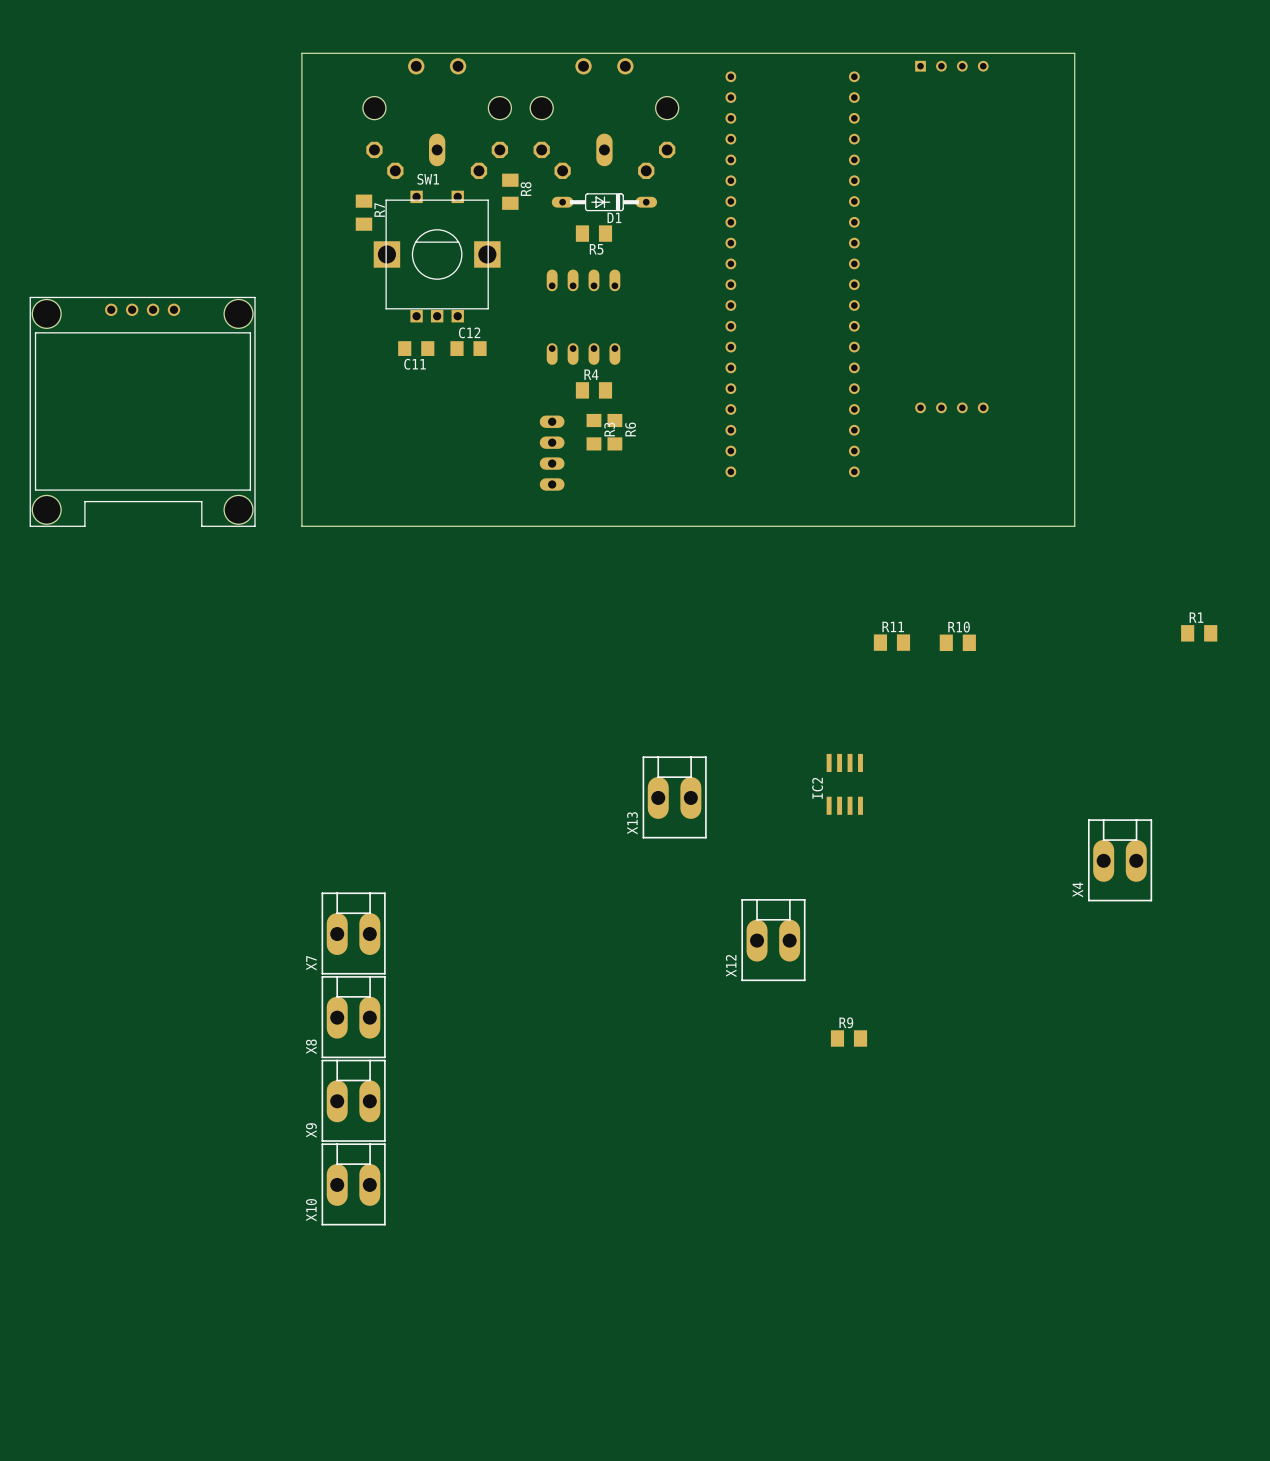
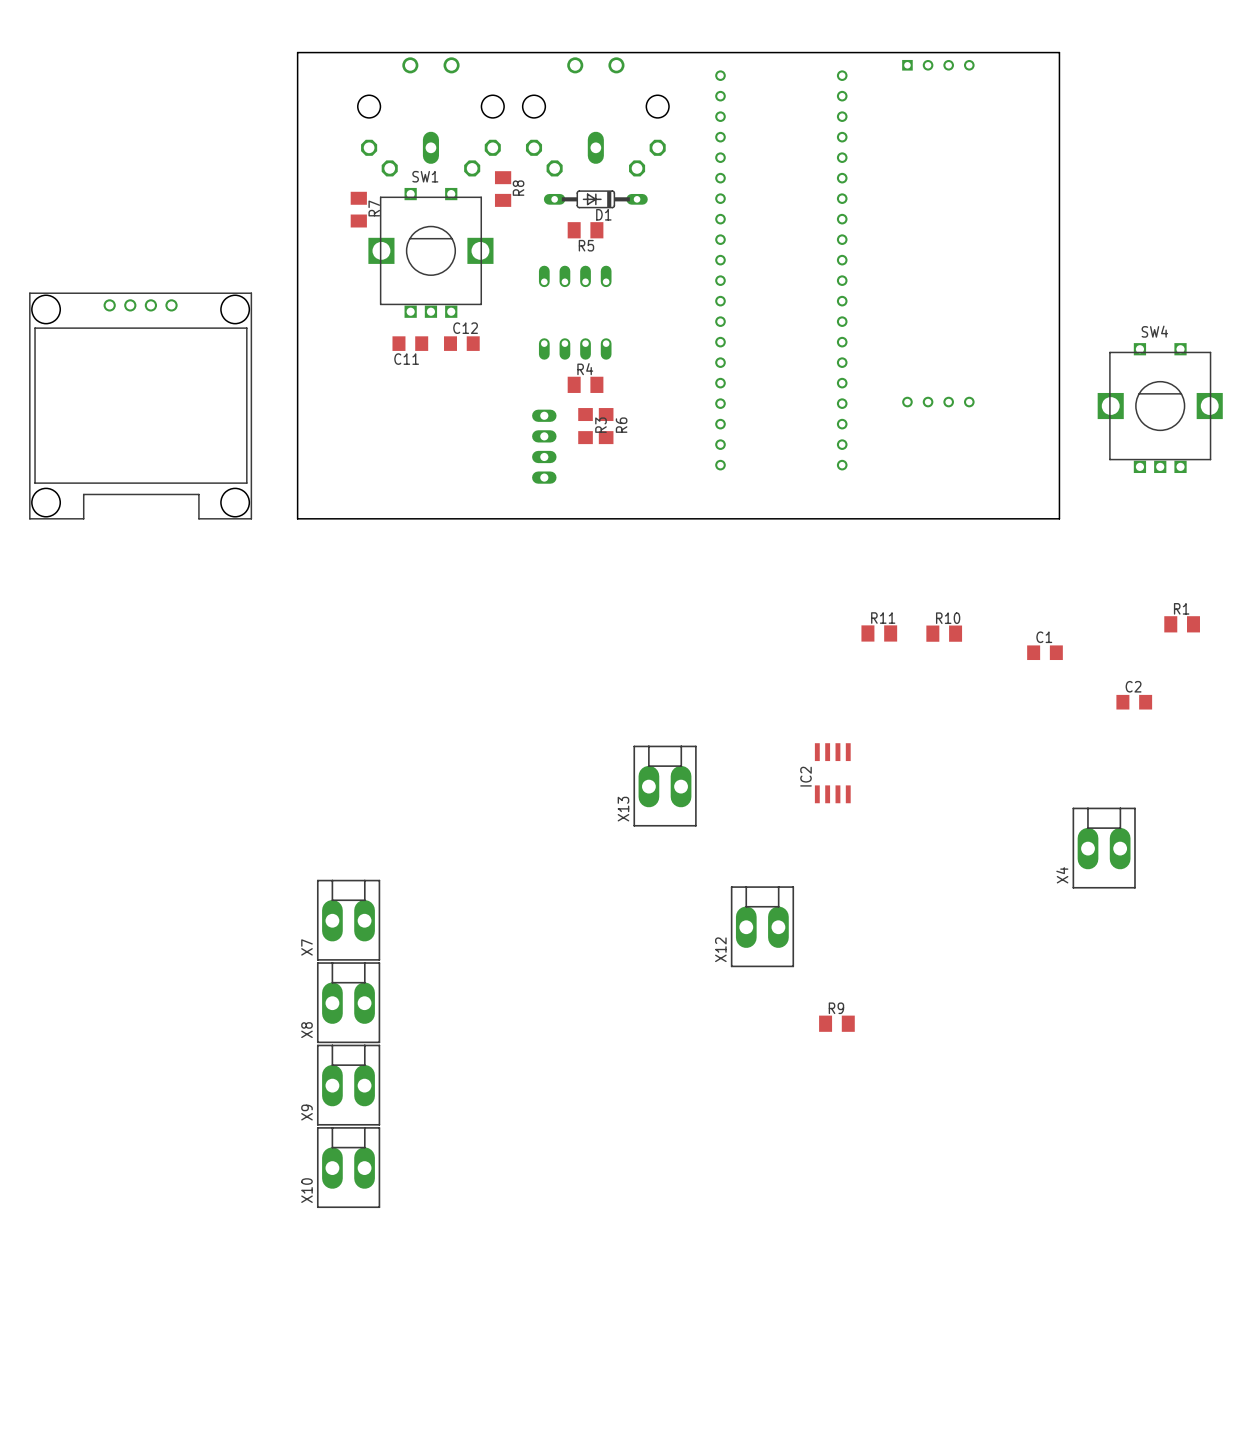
SW4: none -> (1160, 408)
C1: none -> (1044, 652)
C2: none -> (1134, 702)

